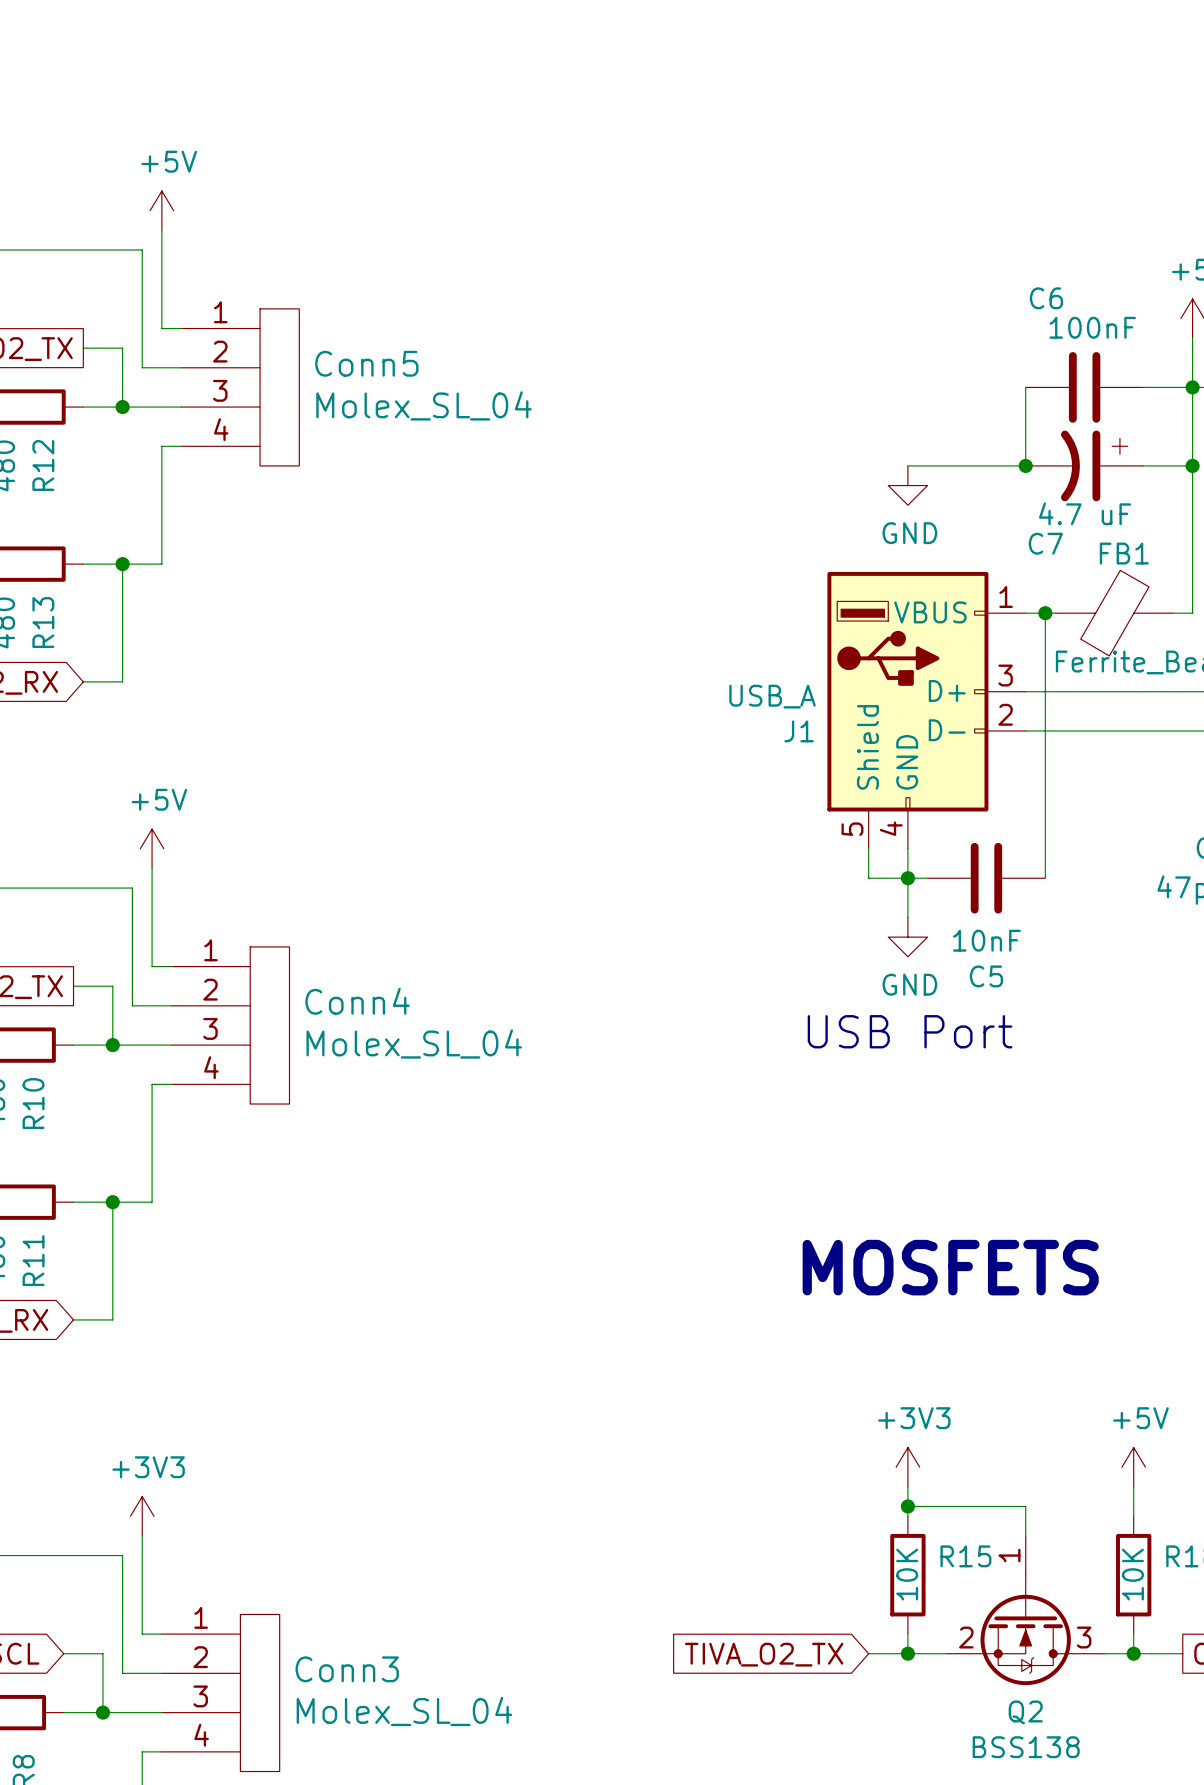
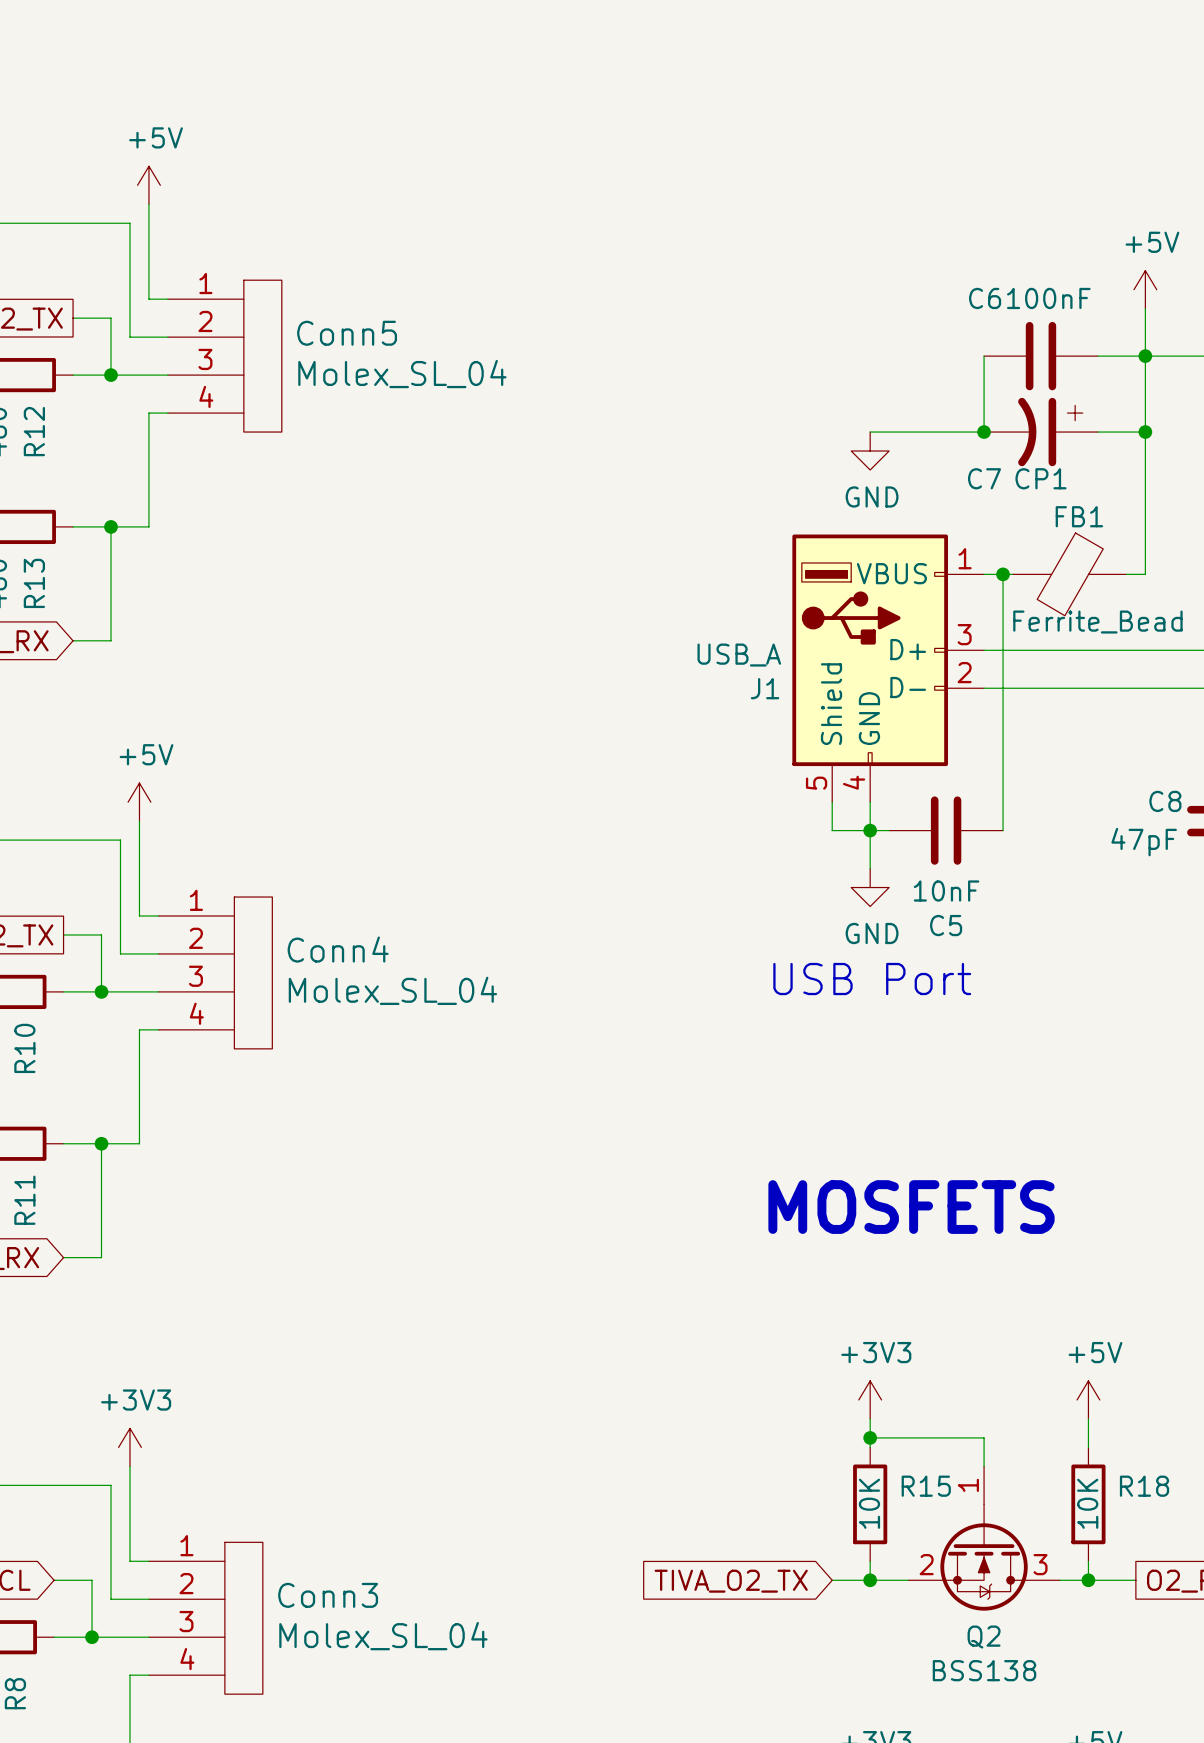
C6 name position: C6 (1046, 298) -> C6 (985, 298)
C7 value: 4.7 uF (1085, 513) -> CP1 (1040, 478)
C7 name position: C7 (1045, 543) -> C7 (984, 478)

